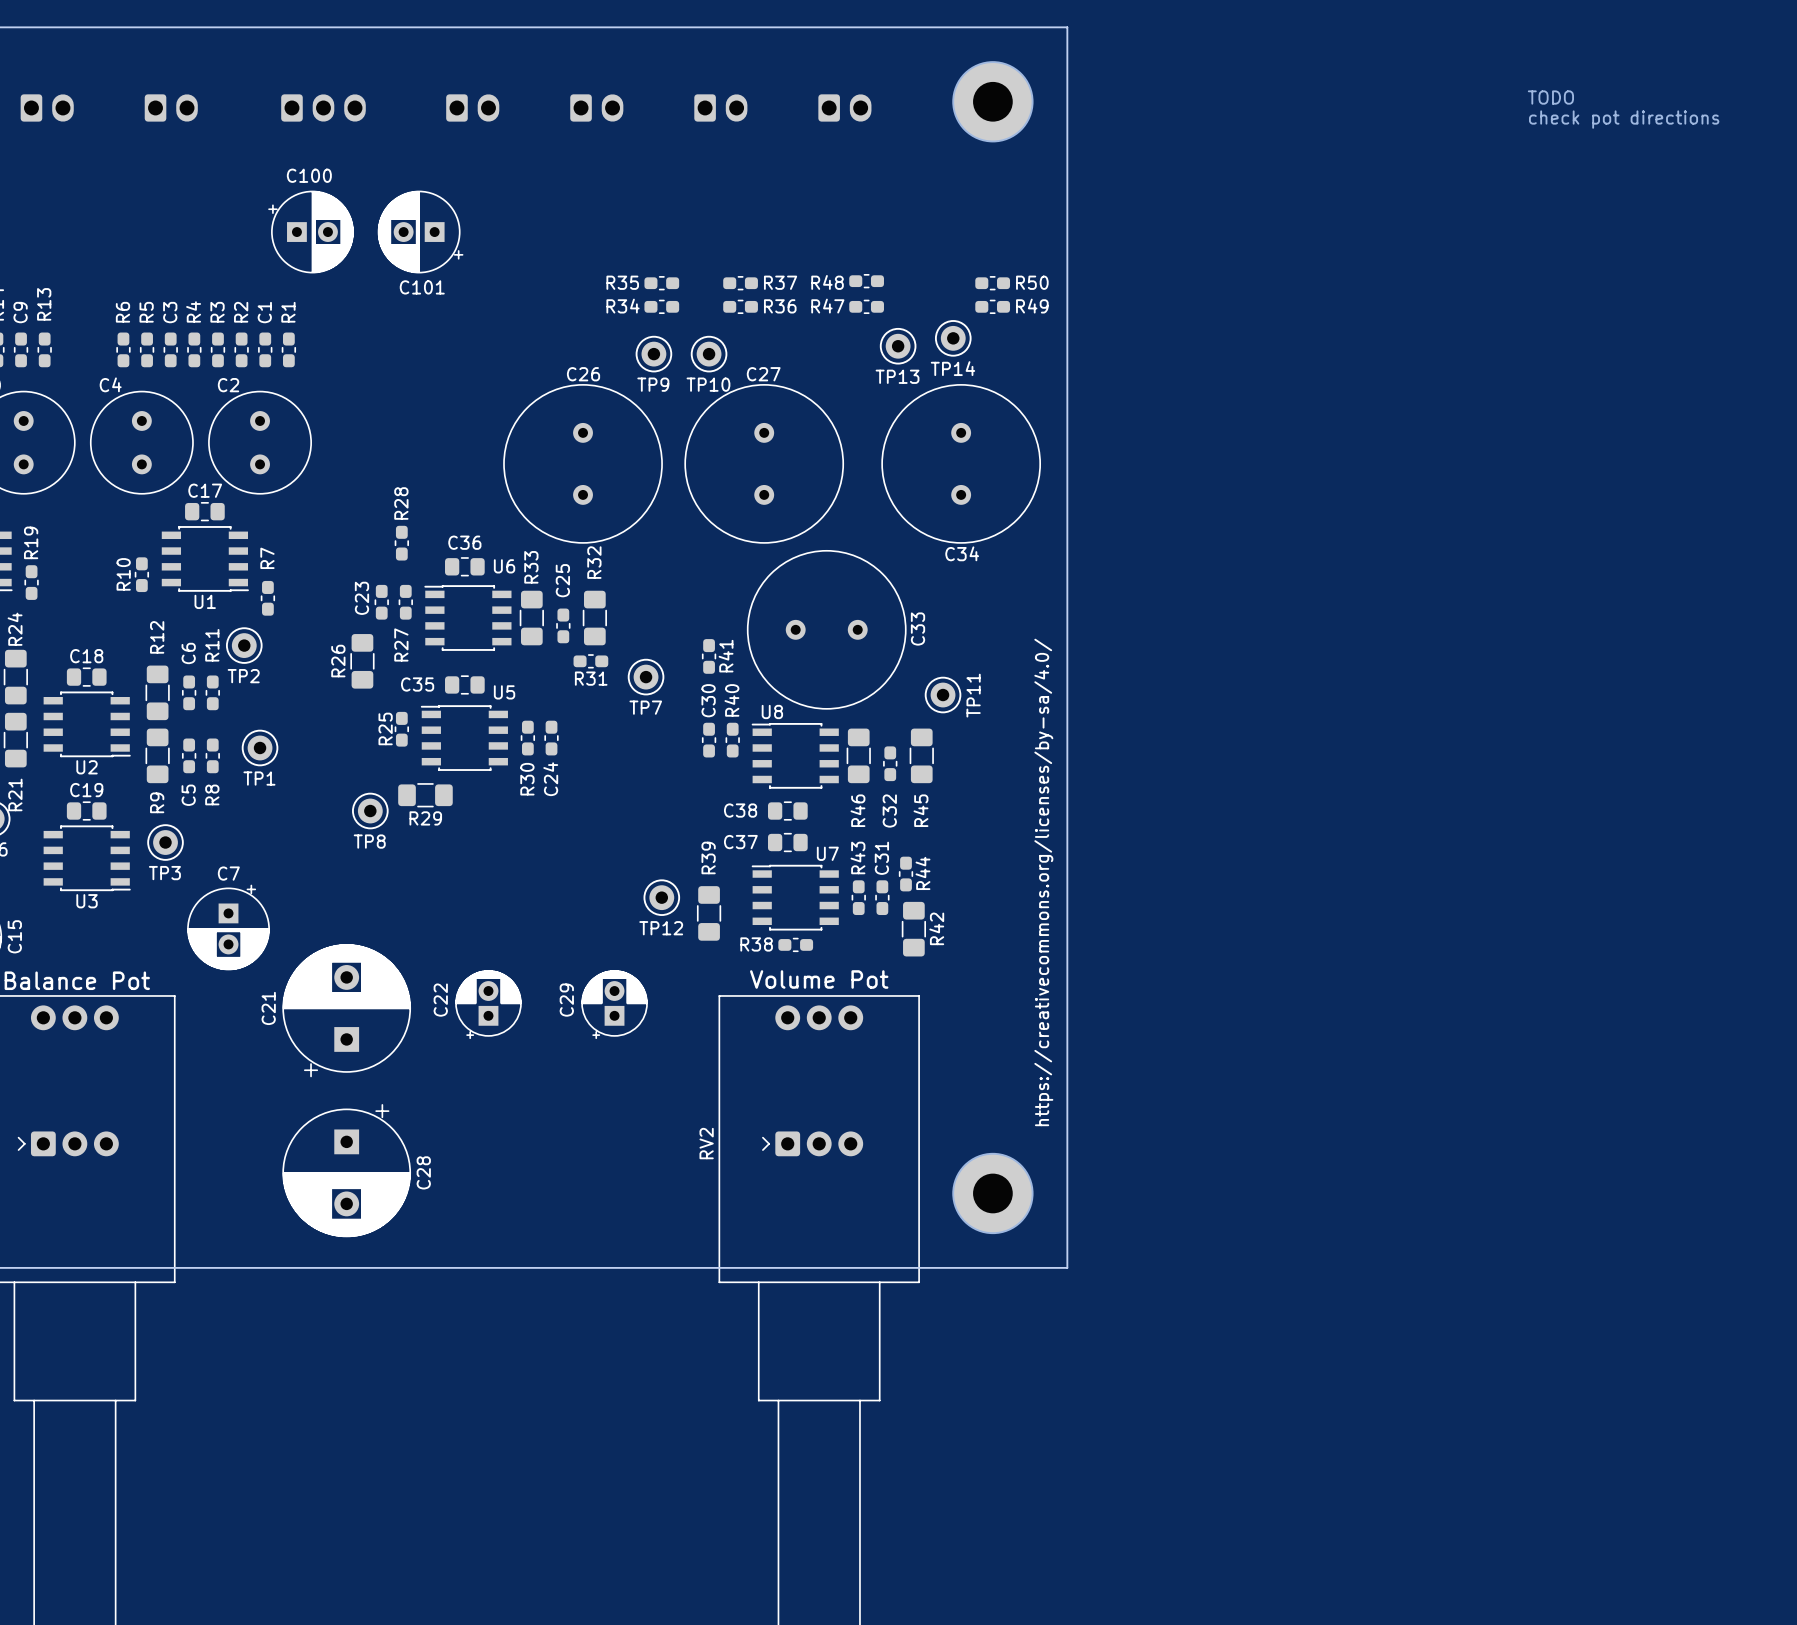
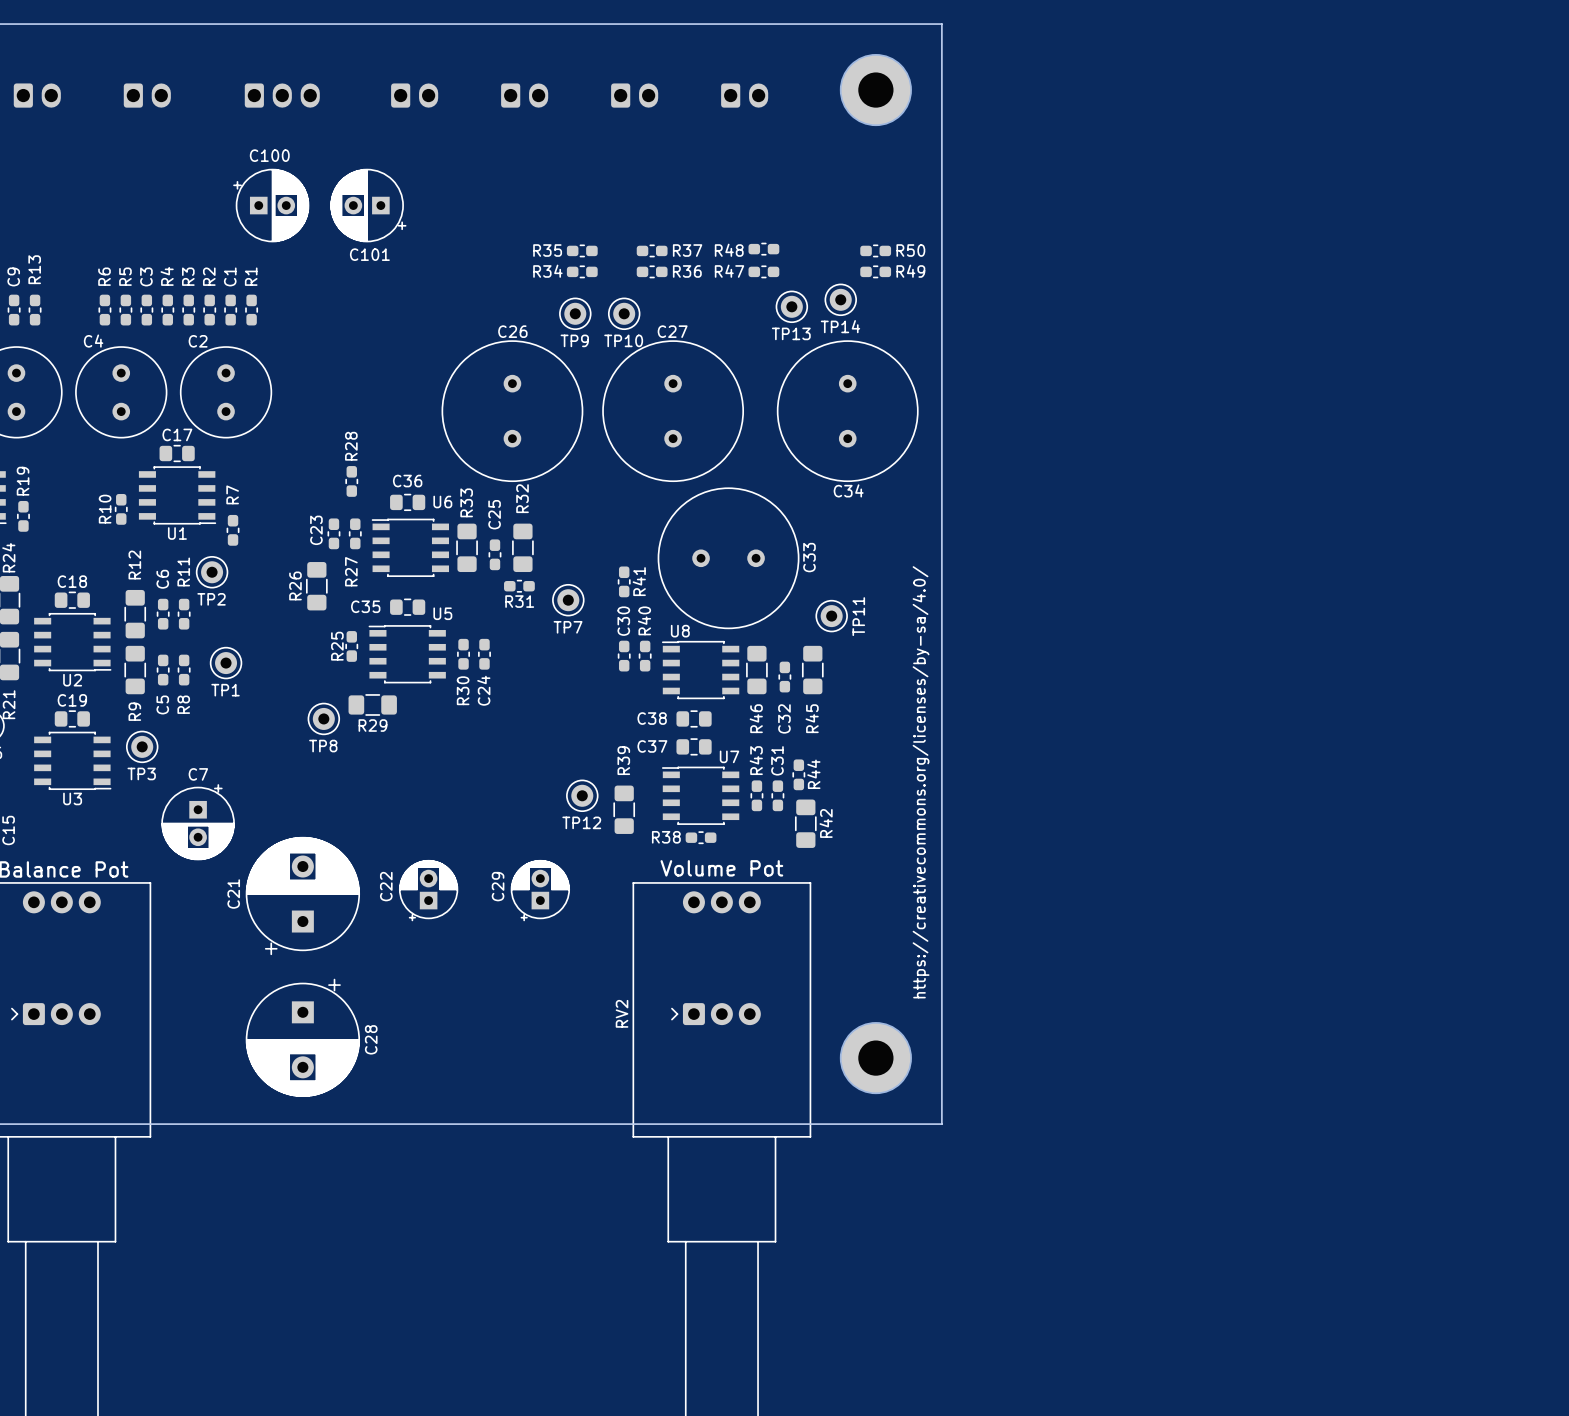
text: TODO (1550, 97) -> none
text: check pot directions (1624, 119) -> none

